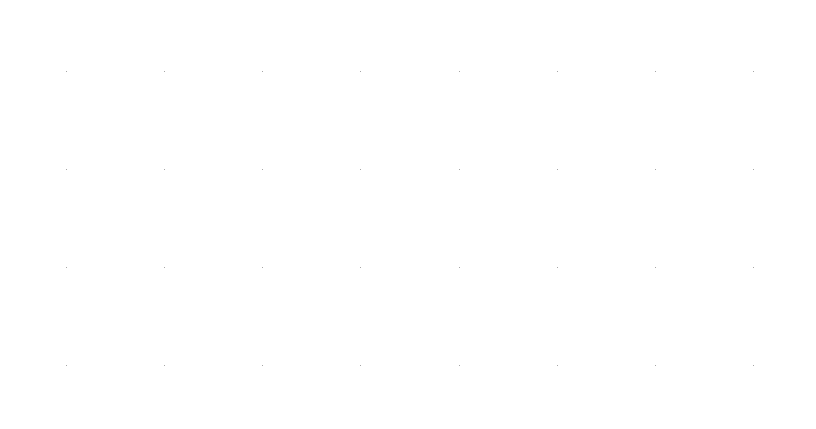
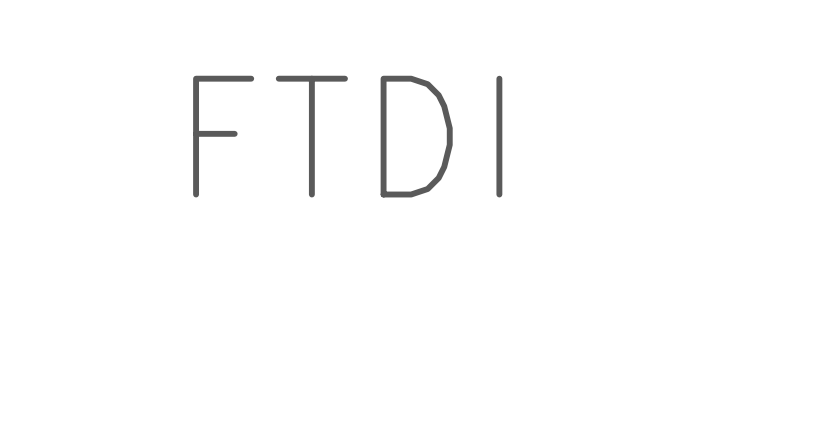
text: none -> FTDI (347, 136)

